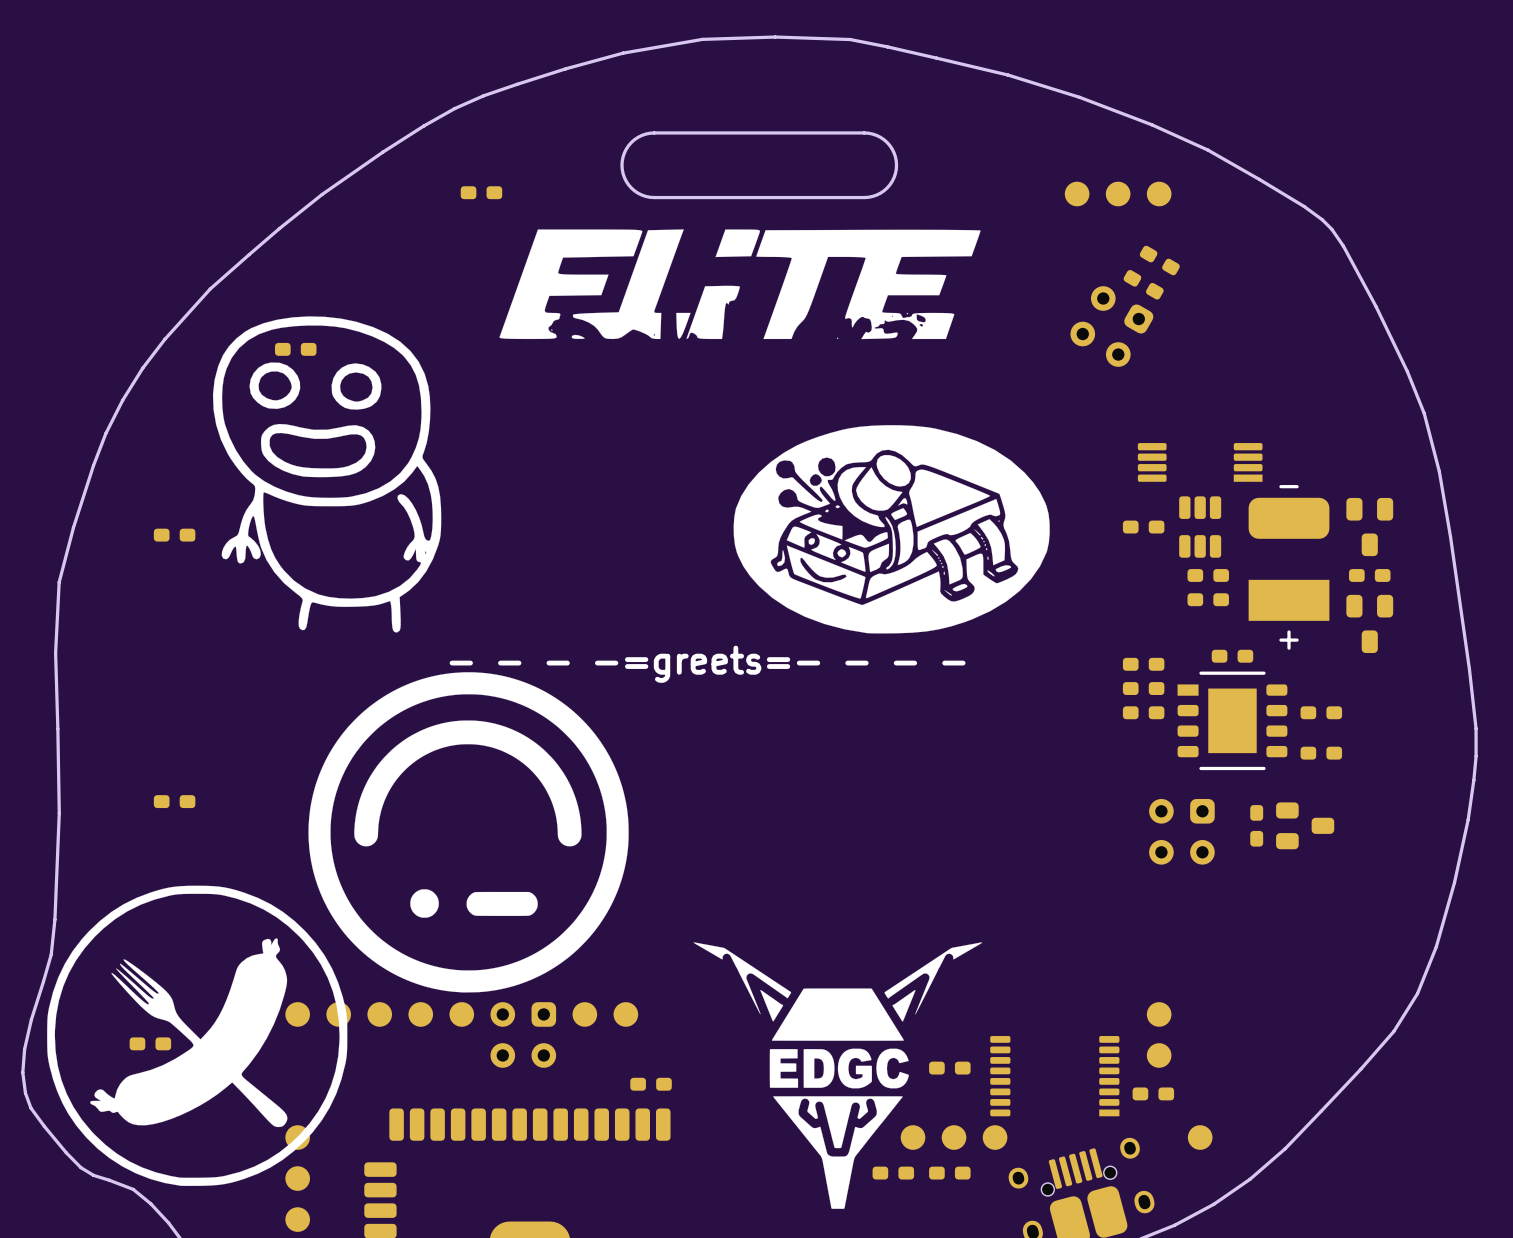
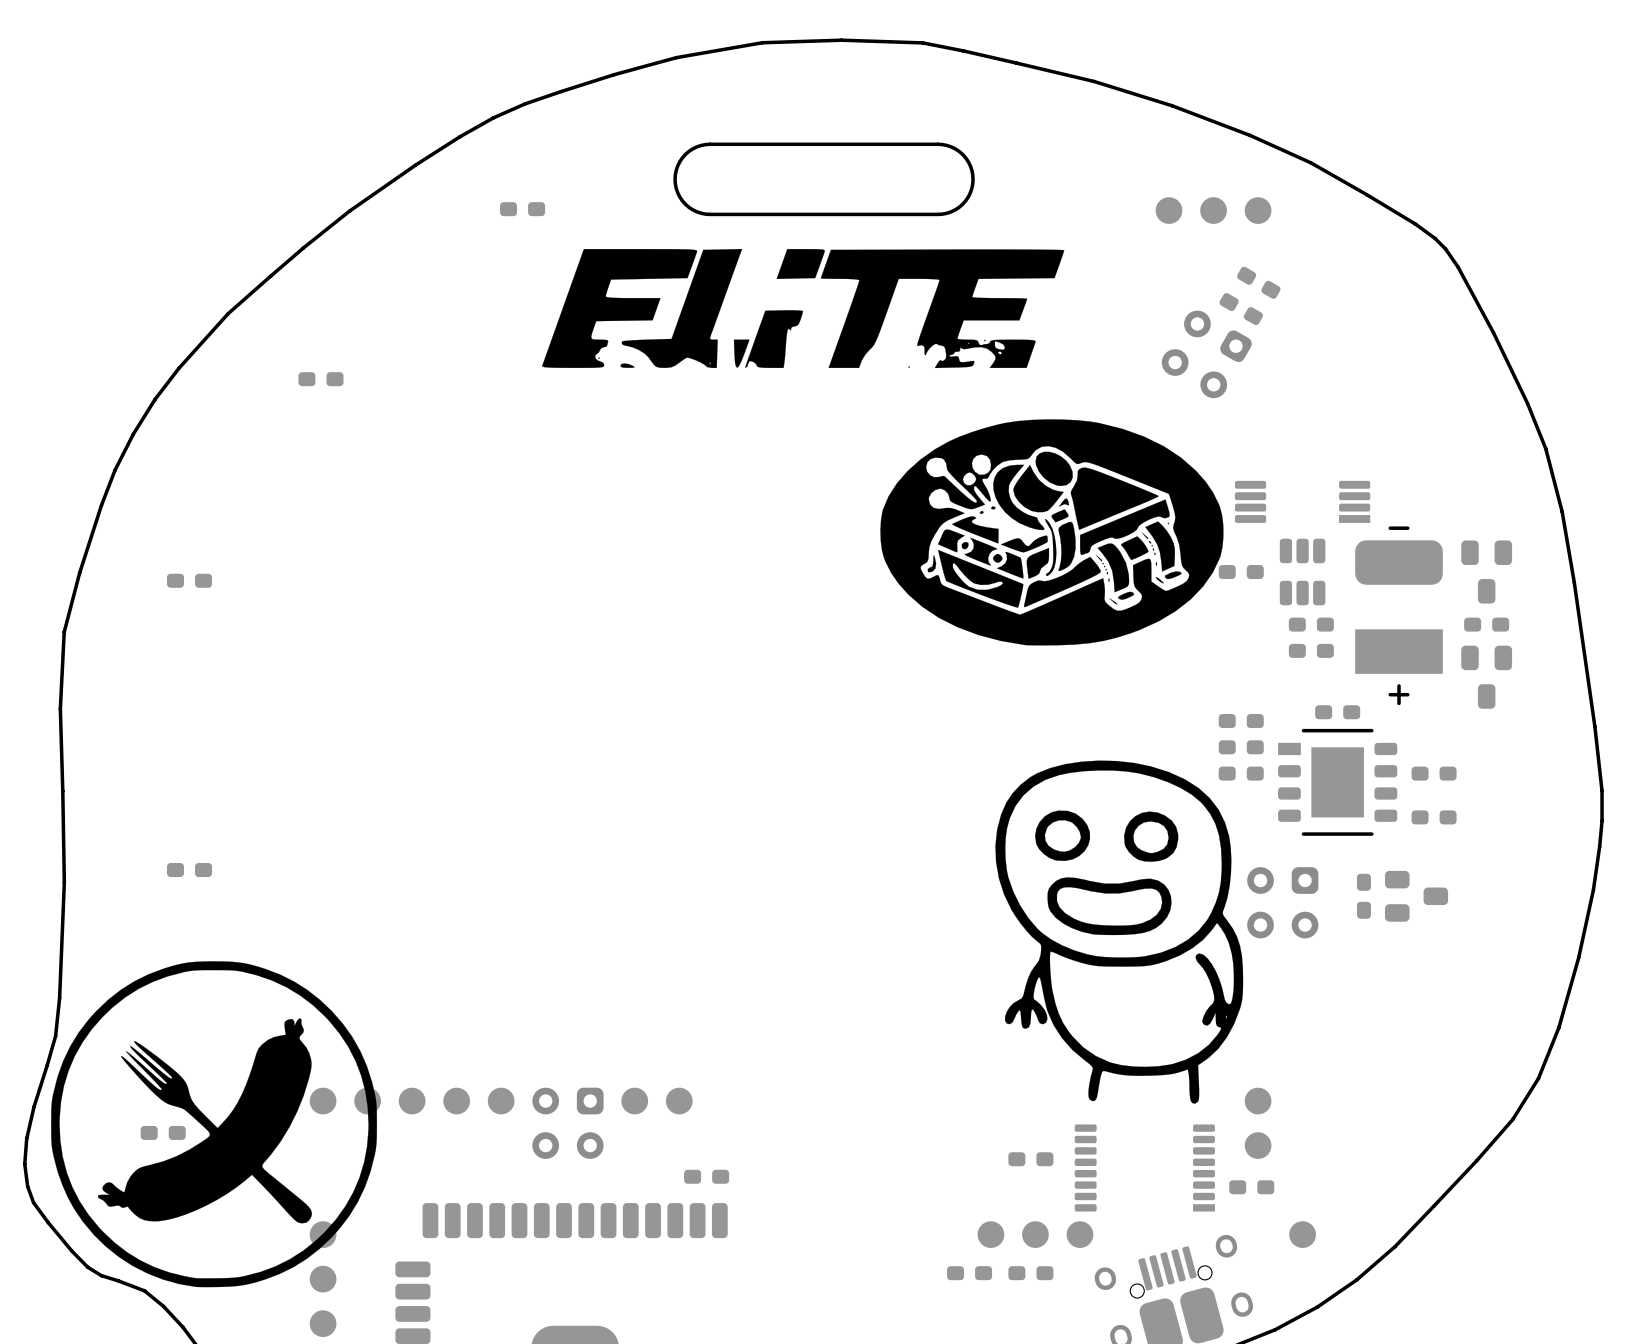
drawing: [212, 316, 442, 633] -> none
drawing position: (891, 529) -> (1051, 532)
text: - - - -=greets=- - - - (707, 664) -> none
drawing: [308, 672, 629, 993] -> none
drawing: none -> [995, 760, 1244, 1104]
drawing: [693, 942, 983, 1209] -> none

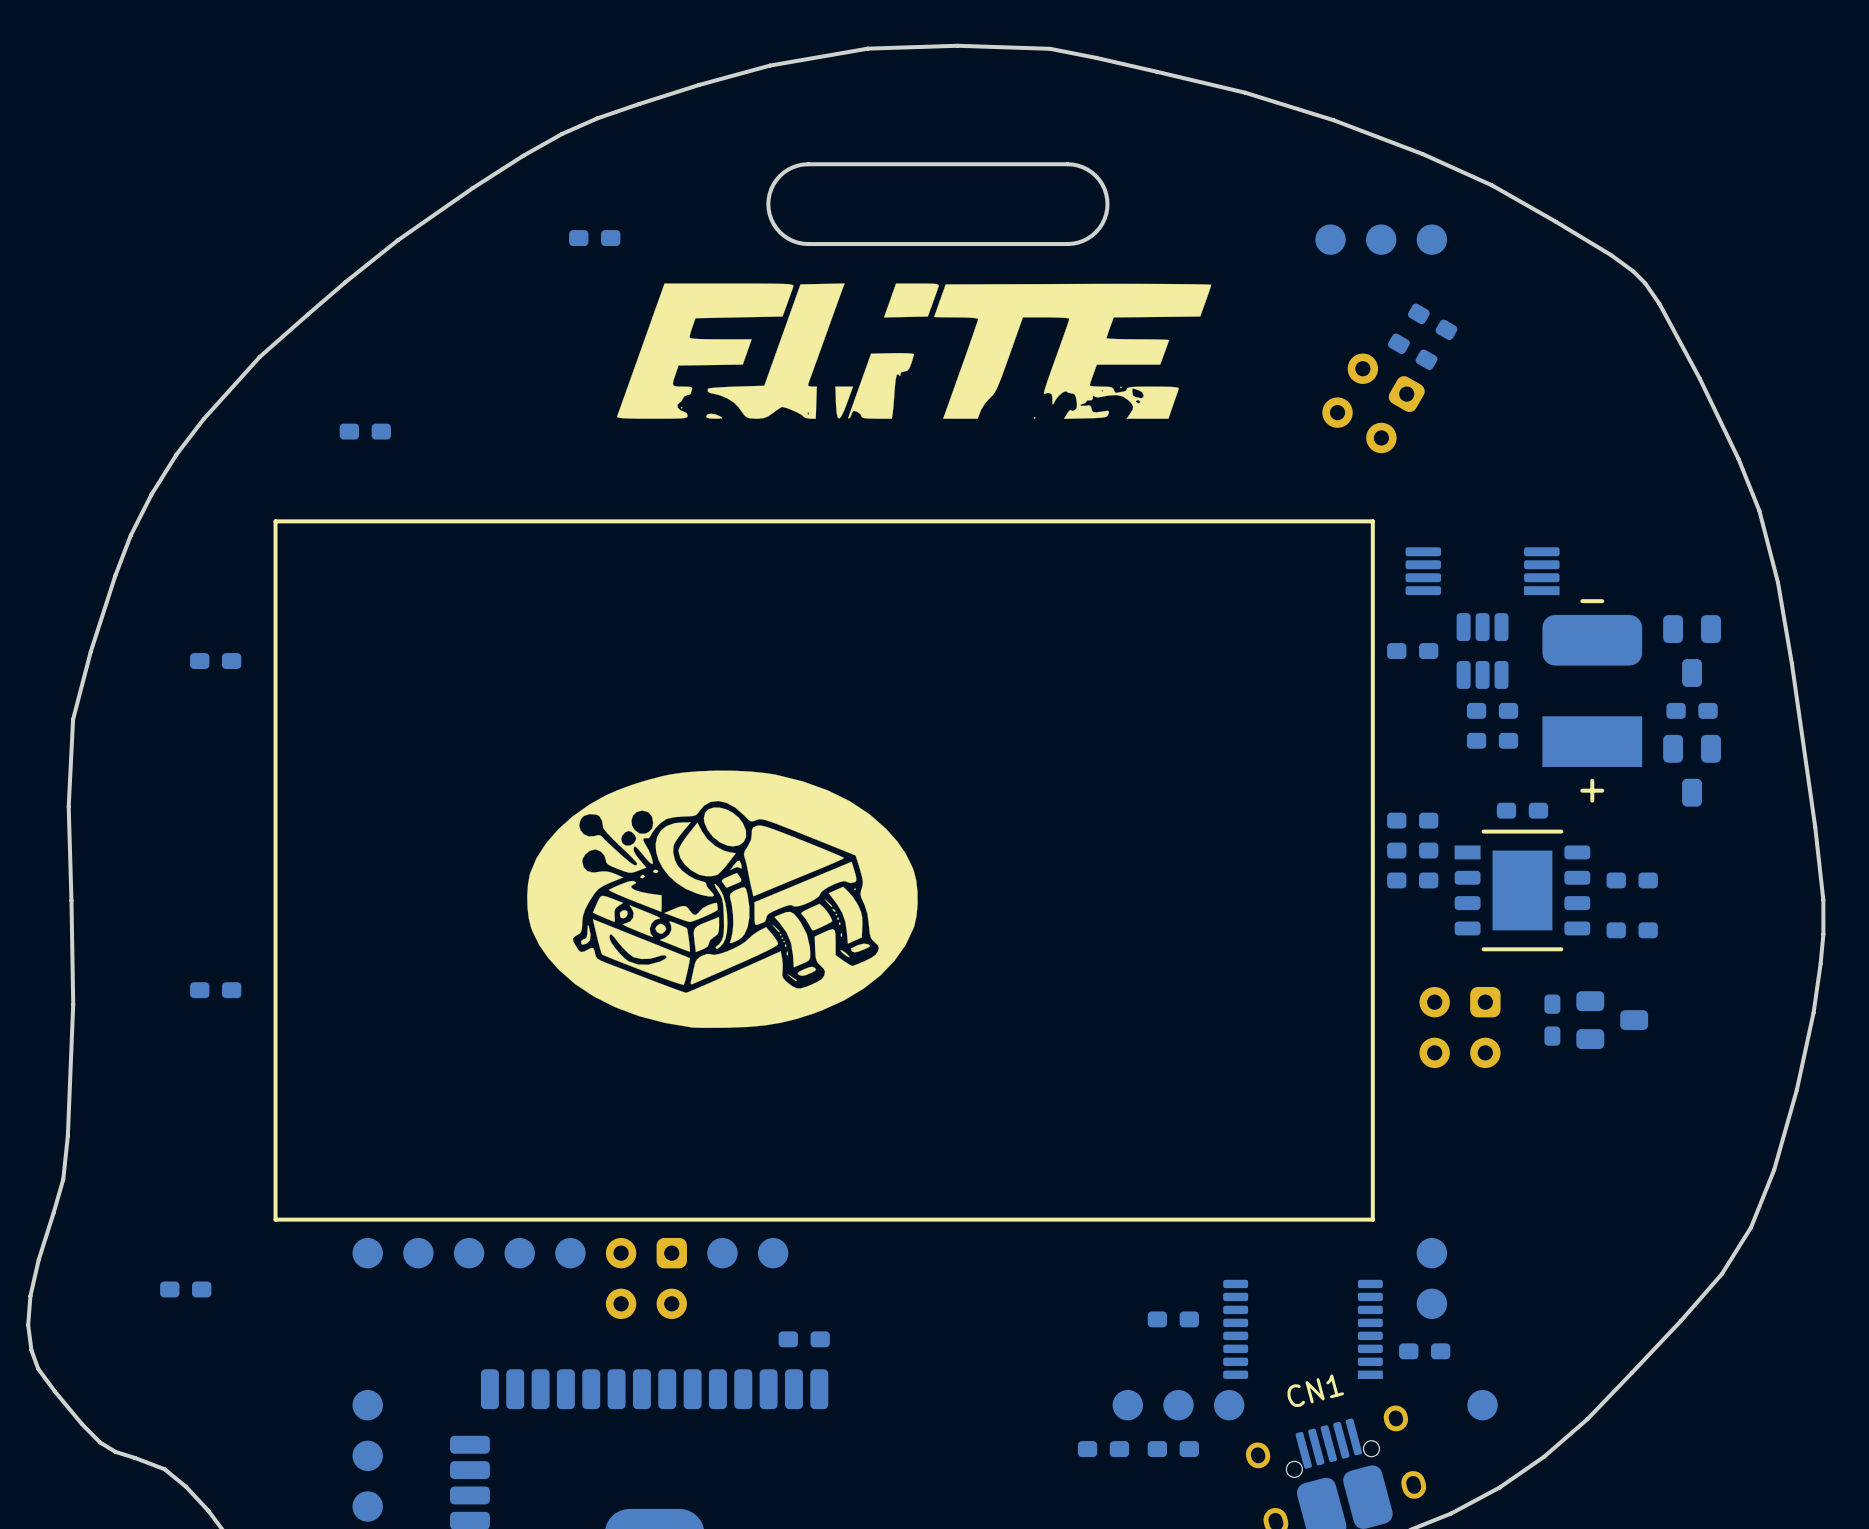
drawing: [880, 419, 1224, 646] -> none
line: none -> (1372, 521) (1372, 1219) (275, 1219) (275, 521) (1372, 521)
drawing: none -> [527, 770, 918, 1028]
drawing: [995, 760, 1244, 1104] -> none
drawing: [51, 961, 377, 1288] -> none
CN1 name: none -> CN1 (1315, 1390)

